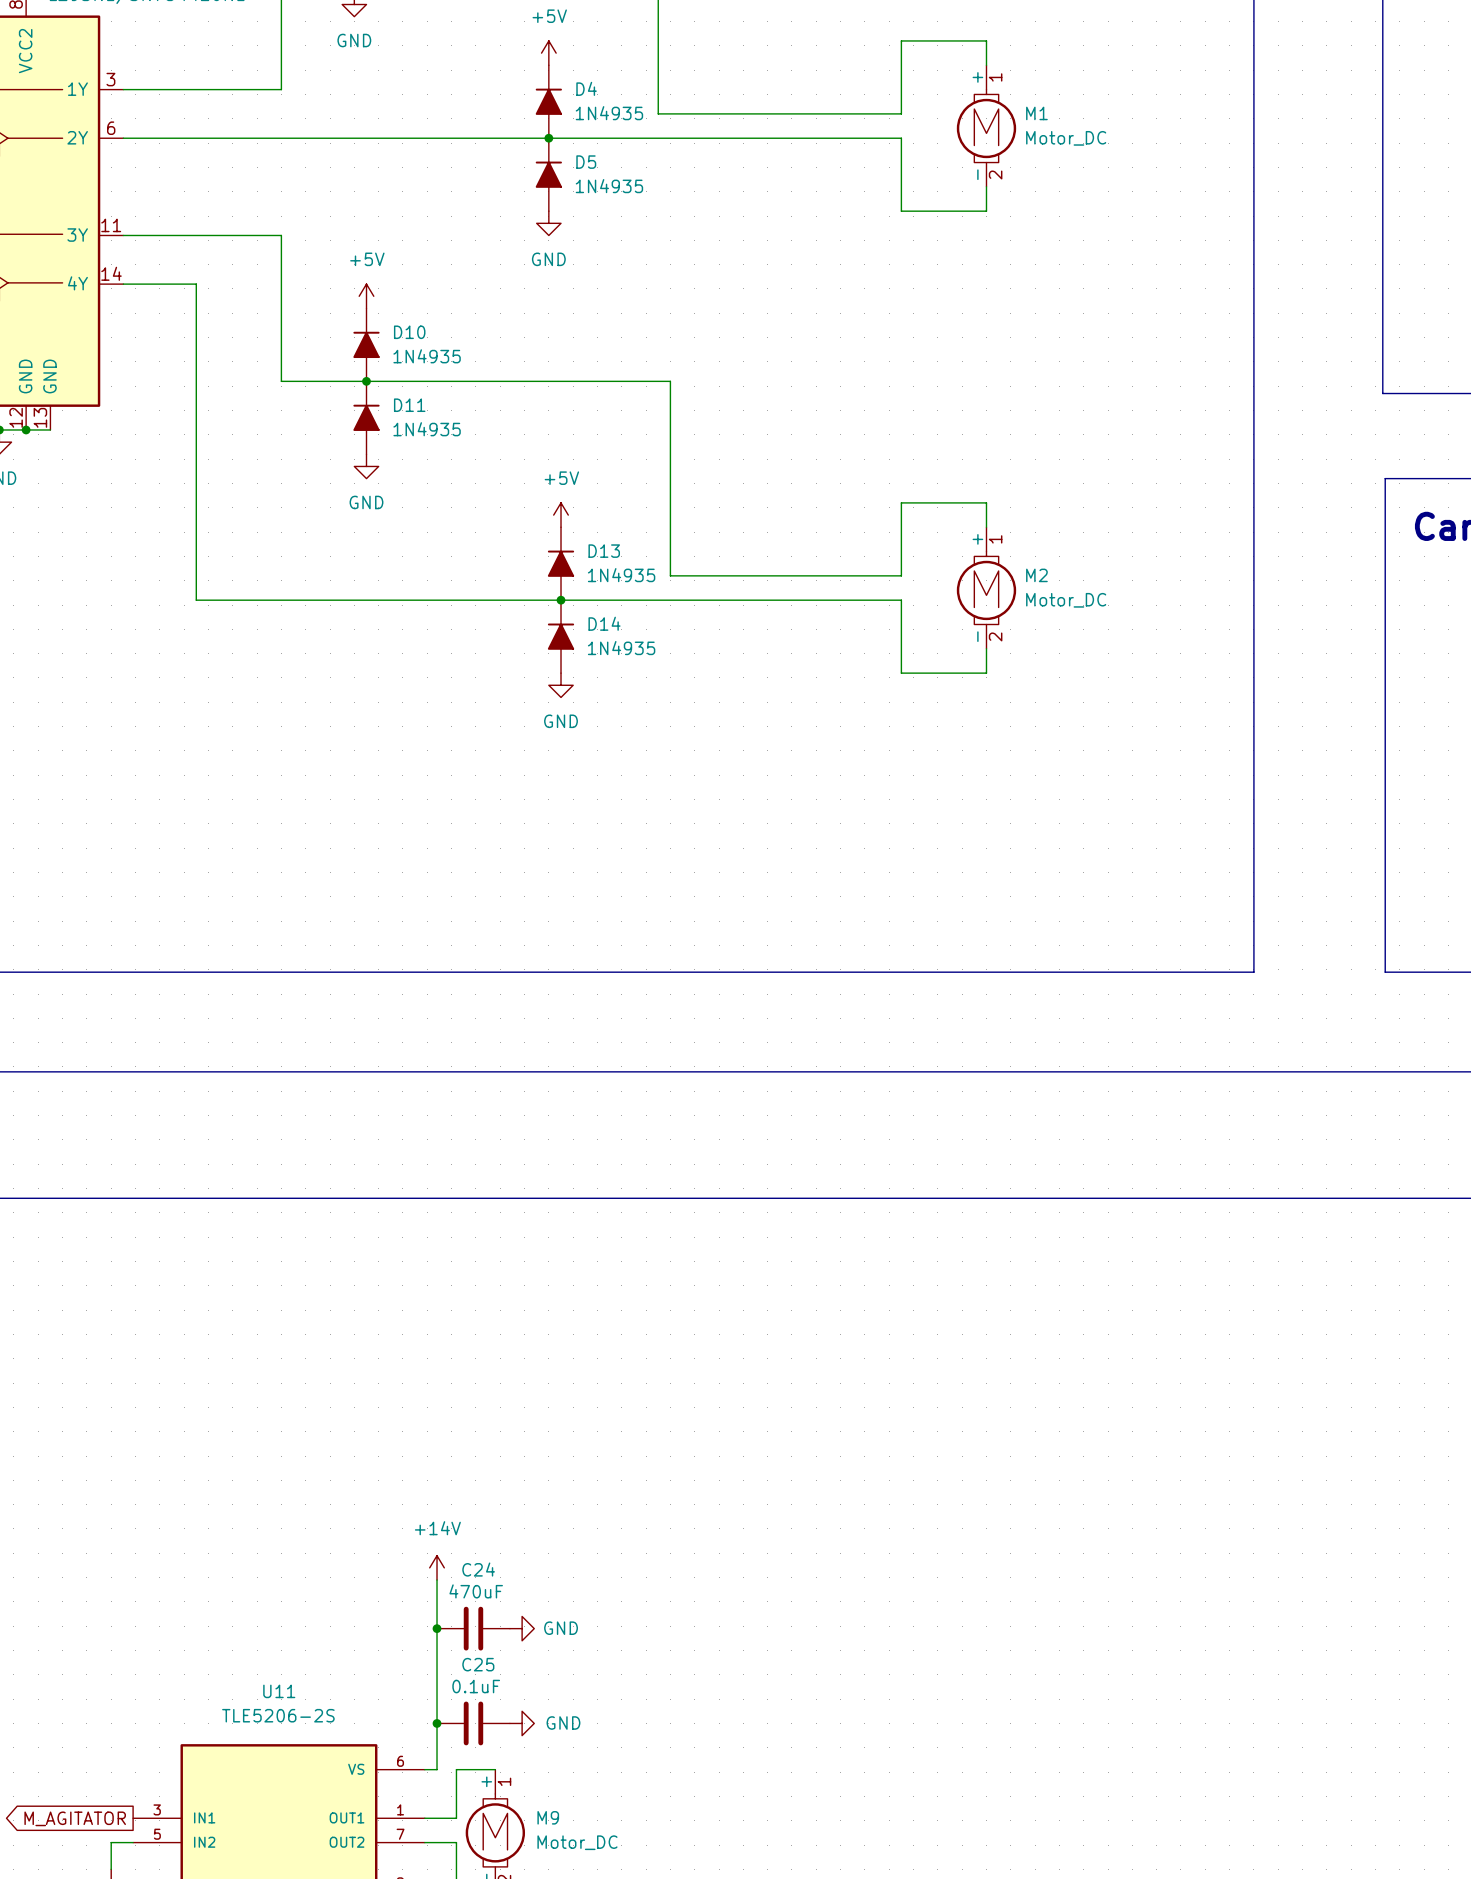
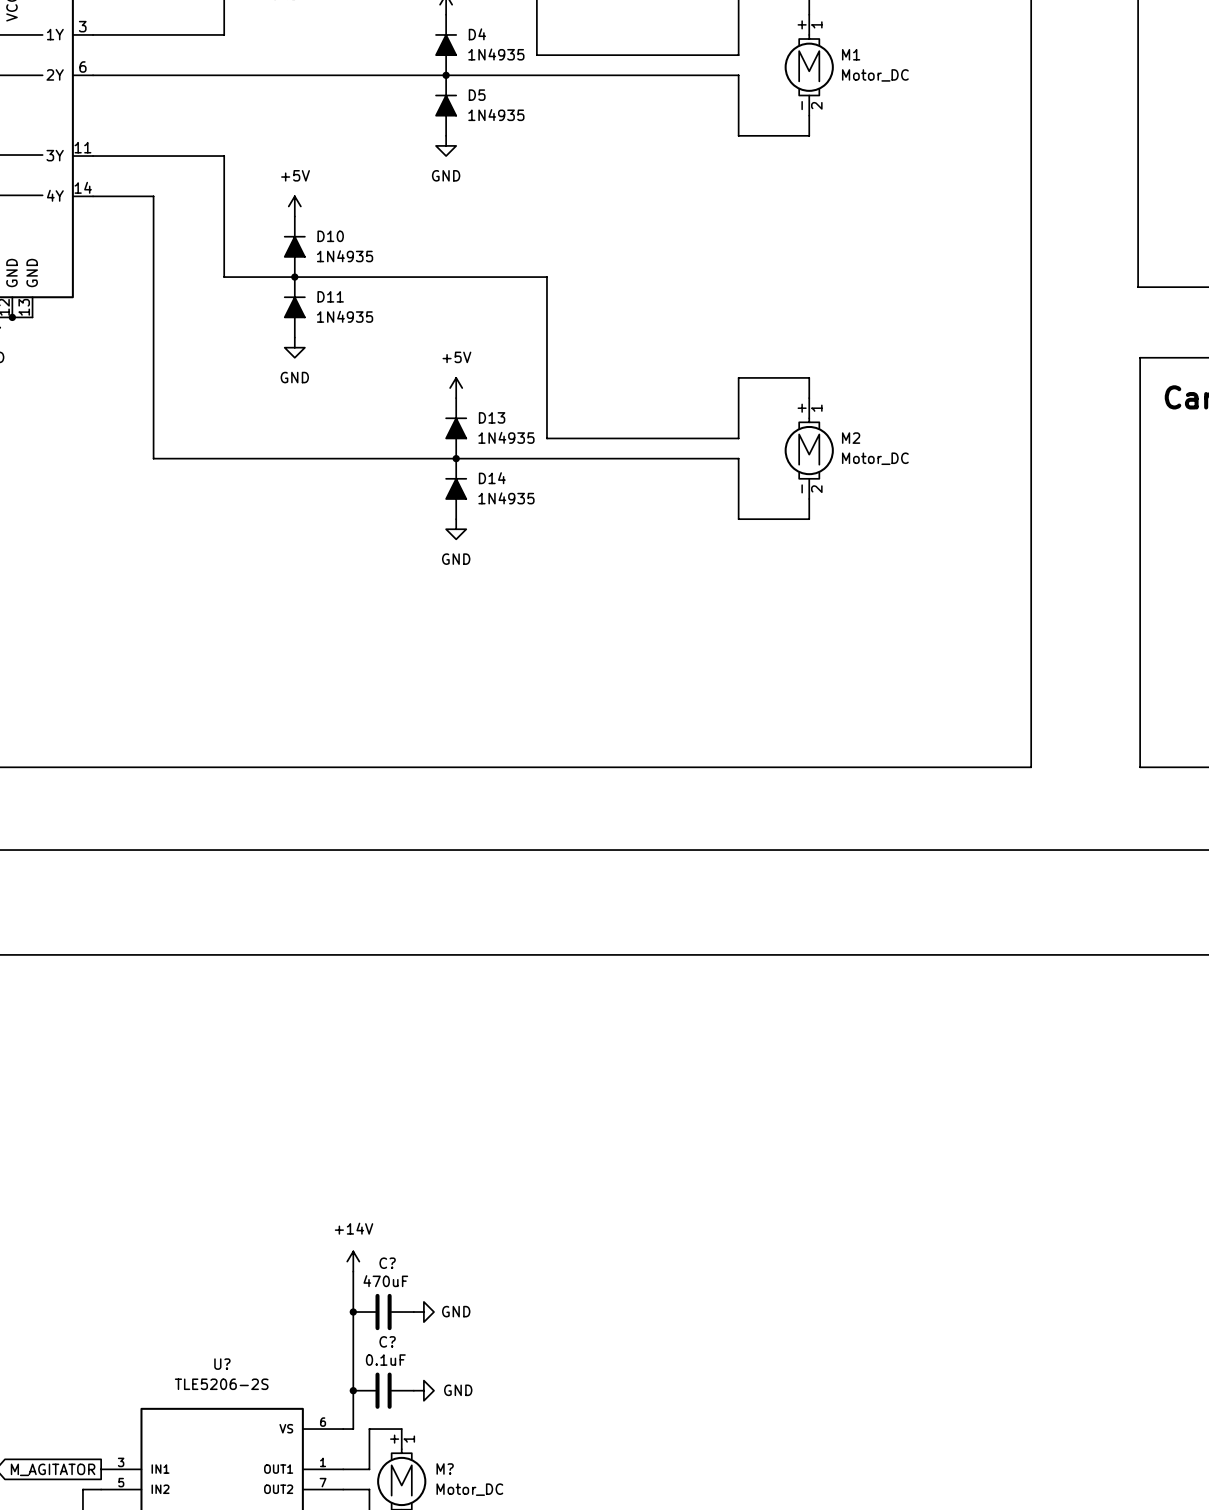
C24 name: C24 (478, 1569) -> C? (387, 1263)
C25 name: C25 (478, 1664) -> C? (387, 1341)
U11 name: U11 (279, 1691) -> U? (222, 1364)
M9 name: M9 (548, 1817) -> M? (445, 1468)

